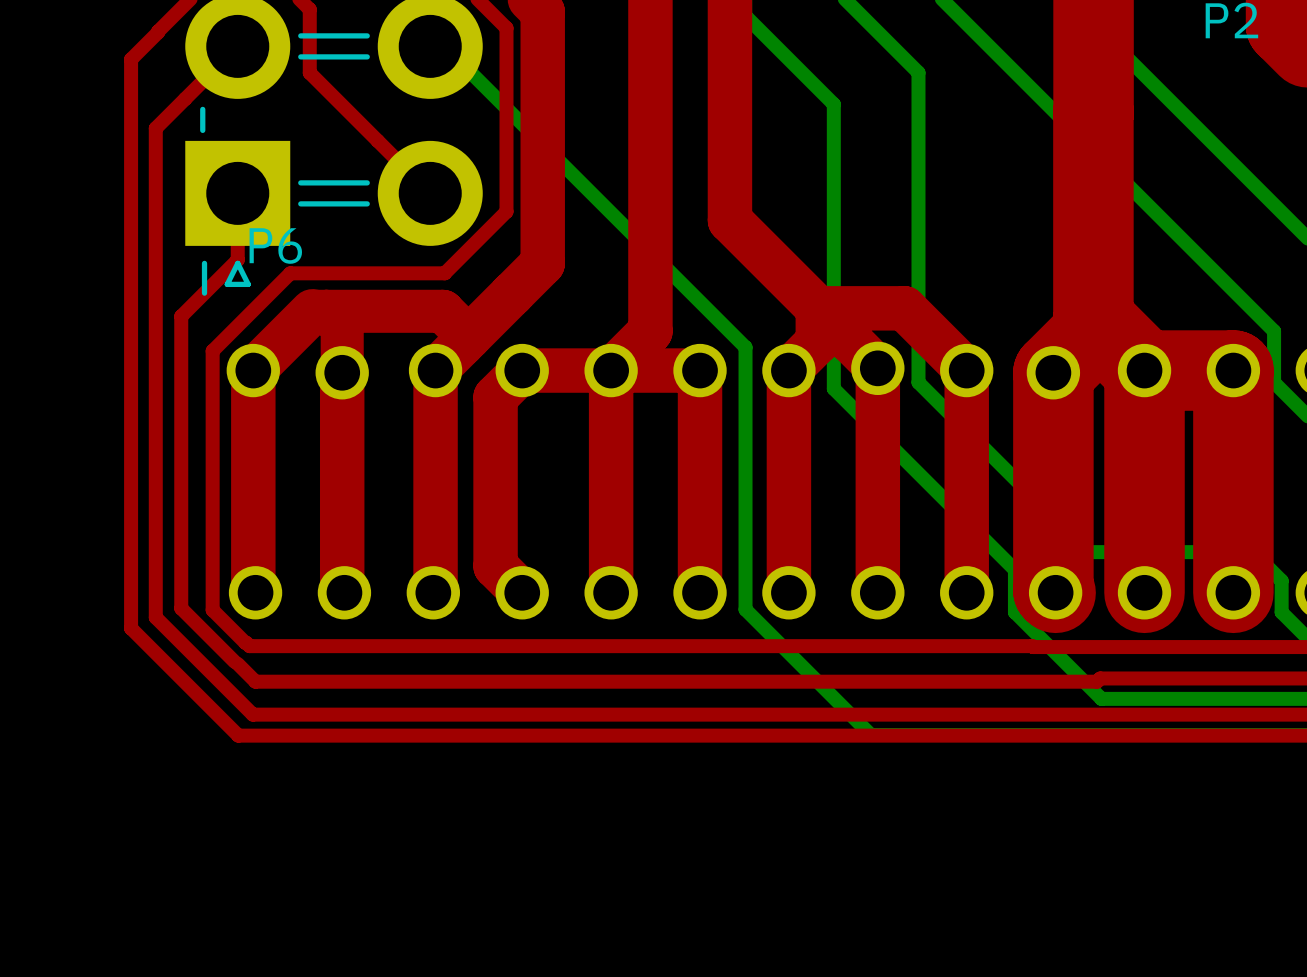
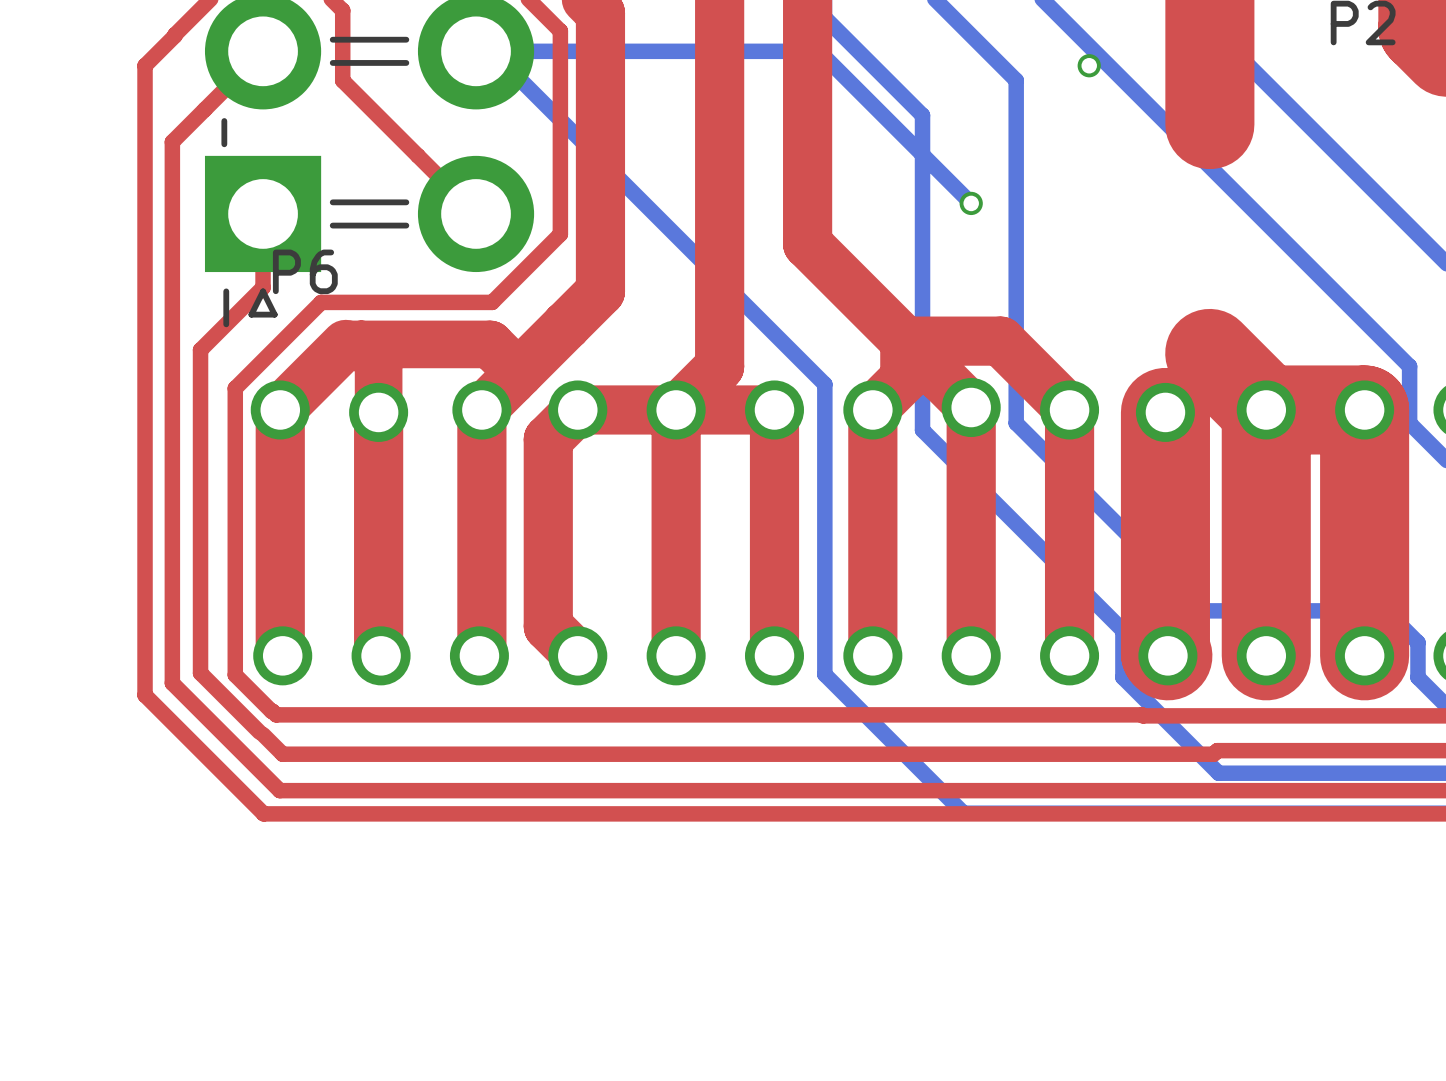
bottom track: none -> (491, 51) (819, 51) (971, 203)
via: none -> (1089, 65)
top track: (1093, 112) (1093, 332) (1053, 372) -> none
via: none -> (971, 203)

